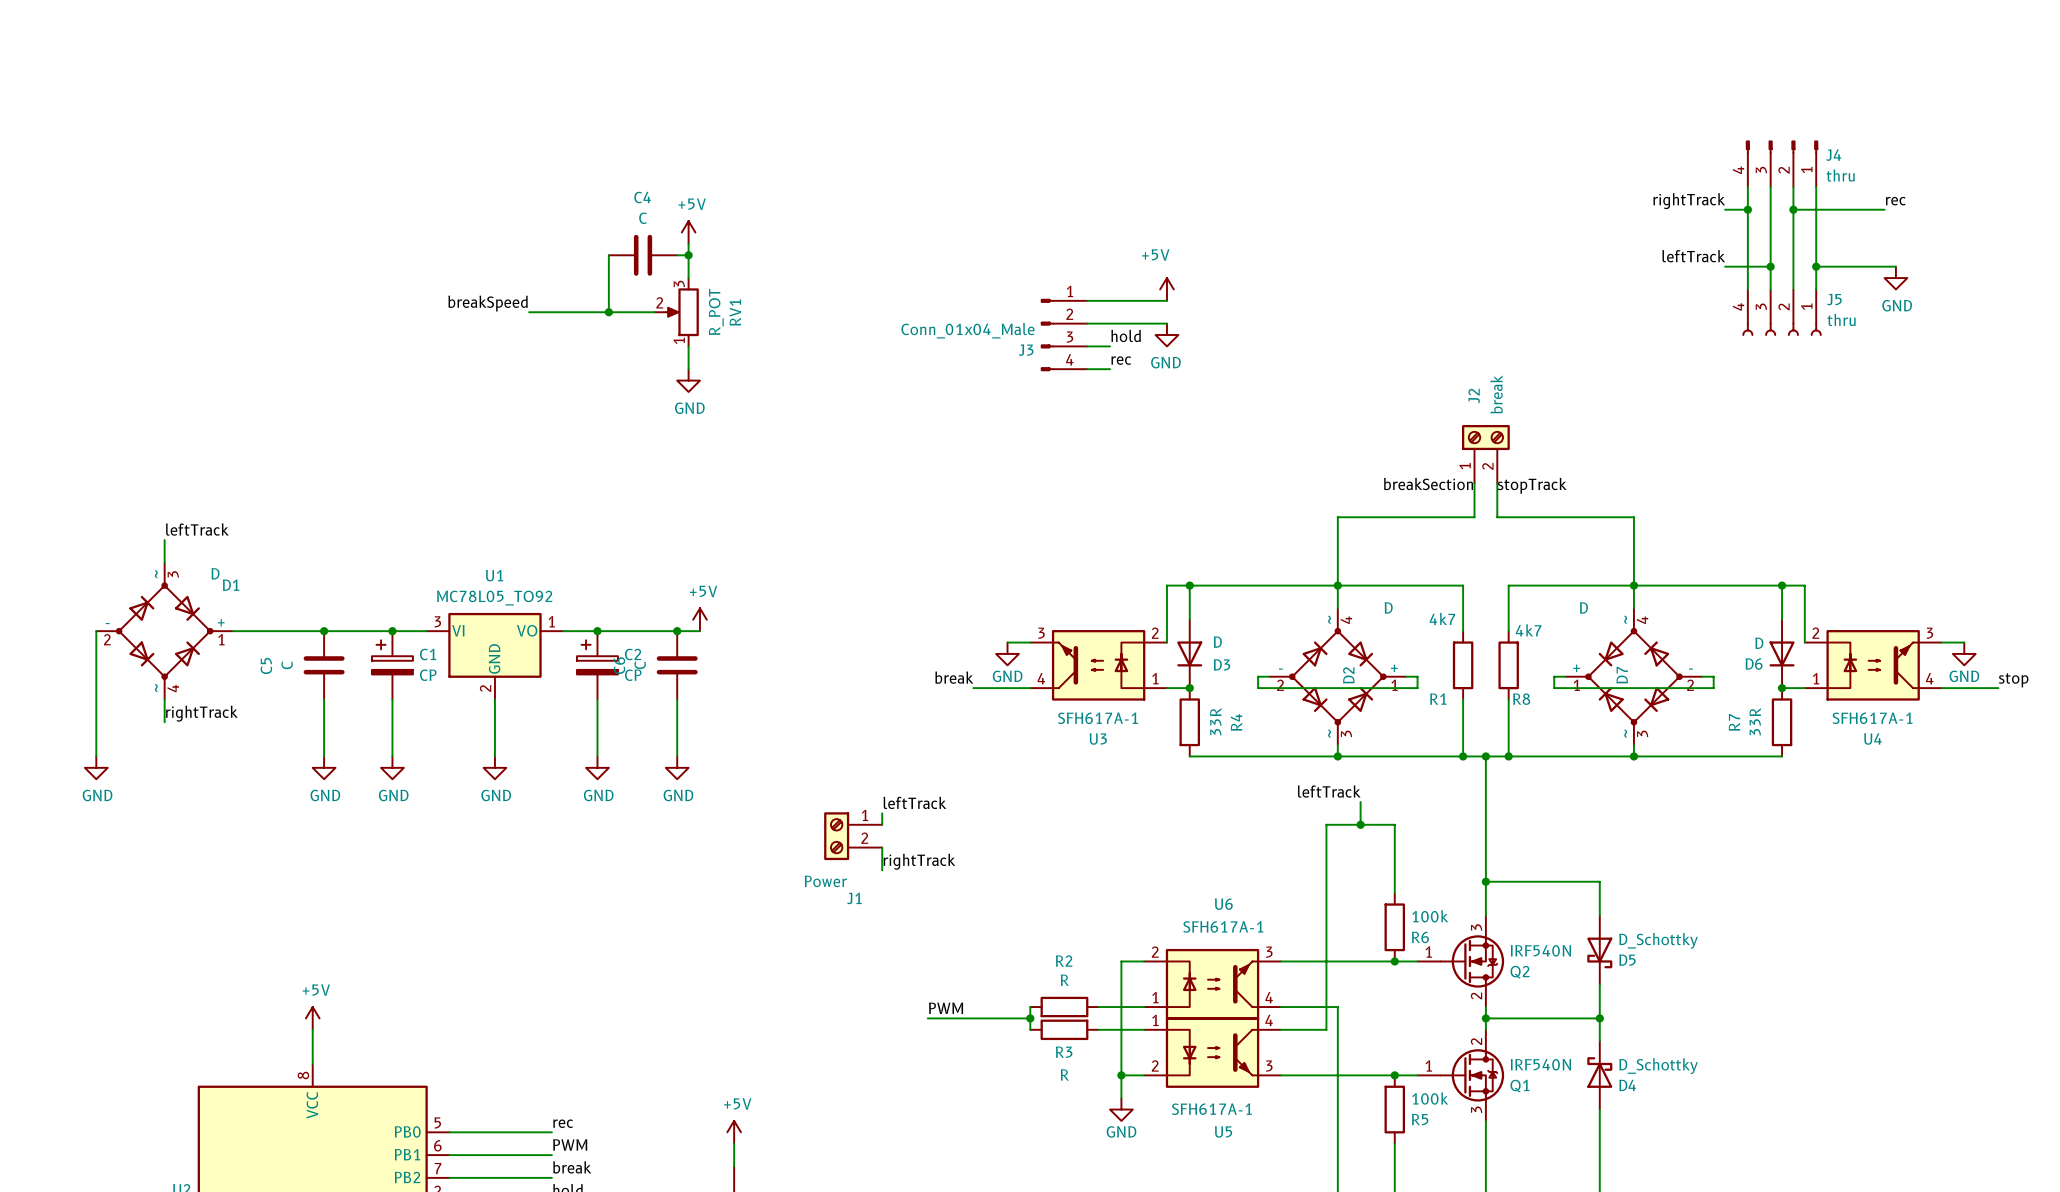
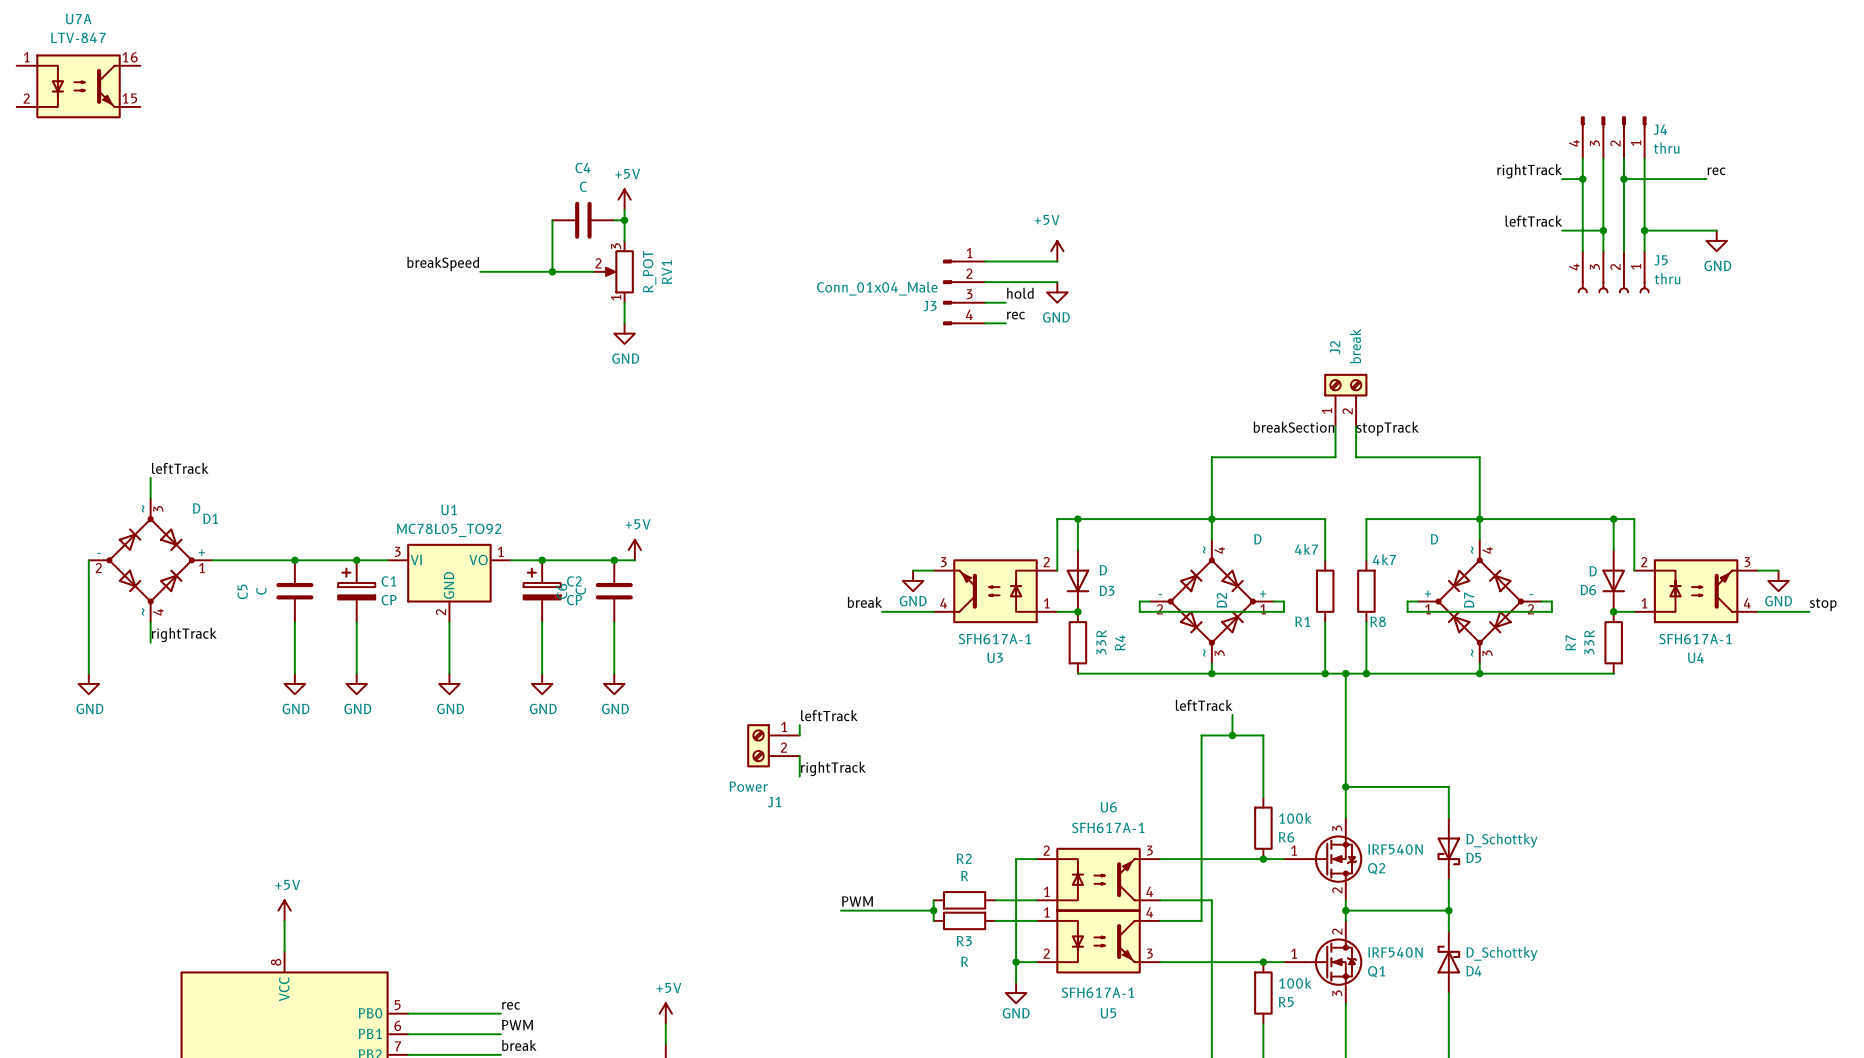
U7A: none -> LTV-847 (78, 86)

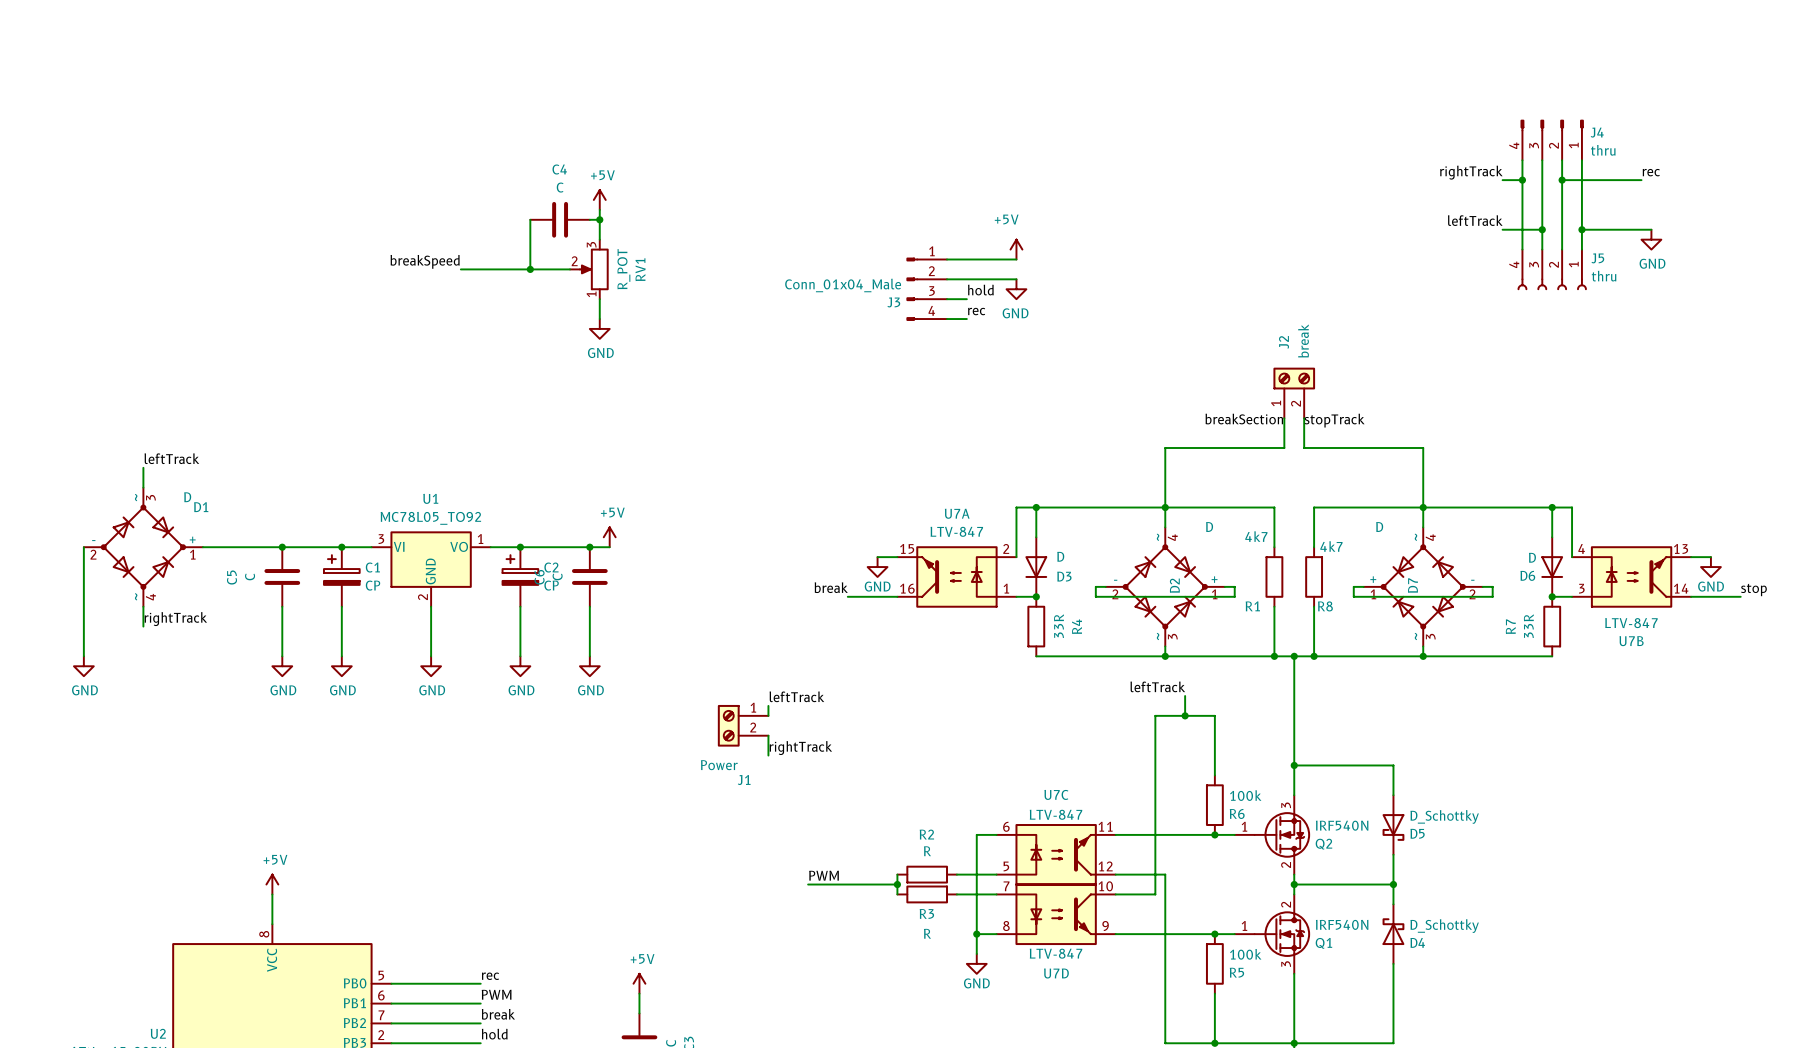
U7A rotation: 0° (78, 86) -> 180° (956, 576)
U7A position: (78, 86) -> (956, 576)
U4 pin number: 2 (1644, 562) -> 4 (1581, 548)
U4 pin number: 3 (1747, 562) -> 13 (1681, 548)
U3: SFH617A-1 (995, 591) -> none
U4 pin number: 1 (1644, 603) -> 3 (1581, 588)
U4 pin number: 4 (1747, 603) -> 14 (1681, 588)
U4 value: SFH617A-1 (1695, 639) -> LTV-847 (1631, 623)
U4 name: U4 (1695, 657) -> U7B (1631, 641)
U6 name: U6 (1108, 807) -> U7C (1056, 794)
U6 value: SFH617A-1 (1108, 827) -> LTV-847 (1056, 814)
U6 pin number: 2 (1046, 850) -> 6 (1006, 826)
U6 pin number: 3 (1149, 850) -> 11 (1105, 826)
U6 pin number: 1 (1046, 891) -> 5 (1006, 866)
U6 pin number: 4 (1149, 891) -> 12 (1105, 866)
U5 pin number: 1 (1046, 912) -> 7 (1006, 886)
U5 pin number: 4 (1149, 912) -> 10 (1105, 886)
U5 pin number: 2 (1046, 953) -> 8 (1006, 926)
U5 pin number: 3 (1149, 953) -> 9 (1105, 926)
U5 value: SFH617A-1 (1097, 992) -> LTV-847 (1056, 953)
U5 name: U5 (1108, 1013) -> U7D (1056, 973)

